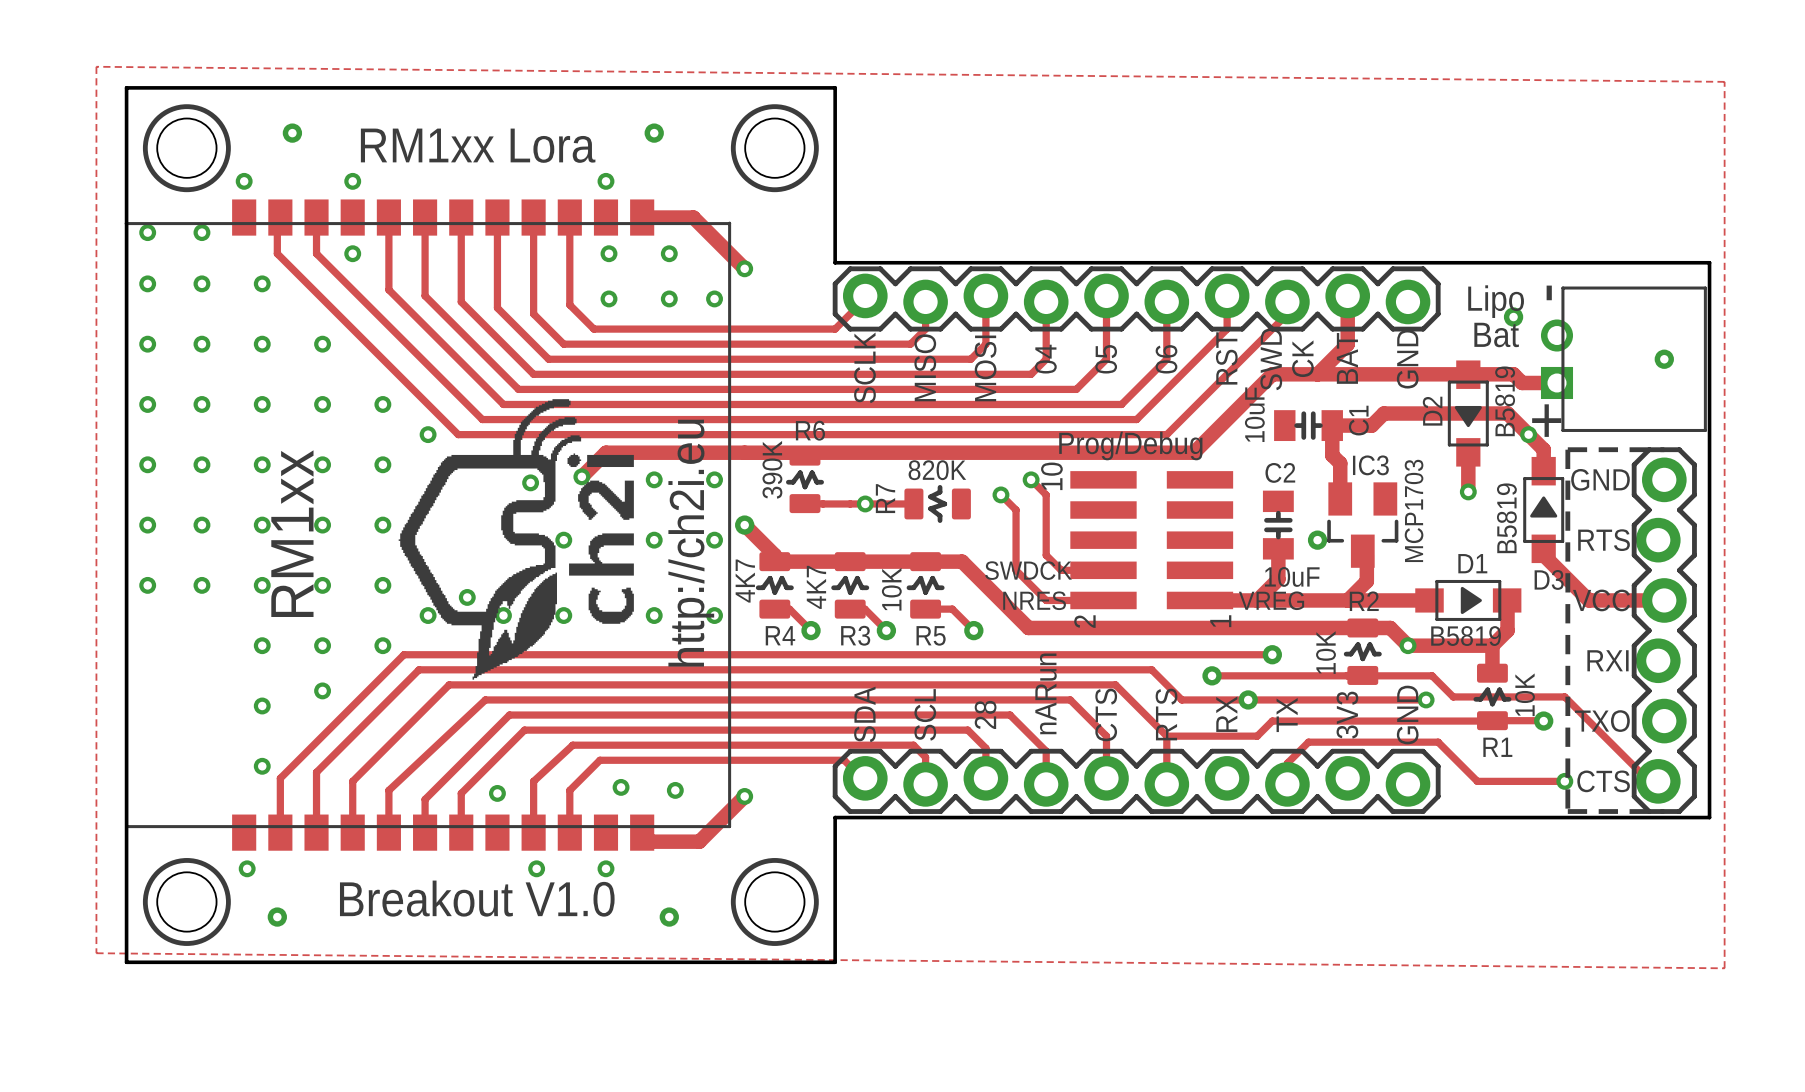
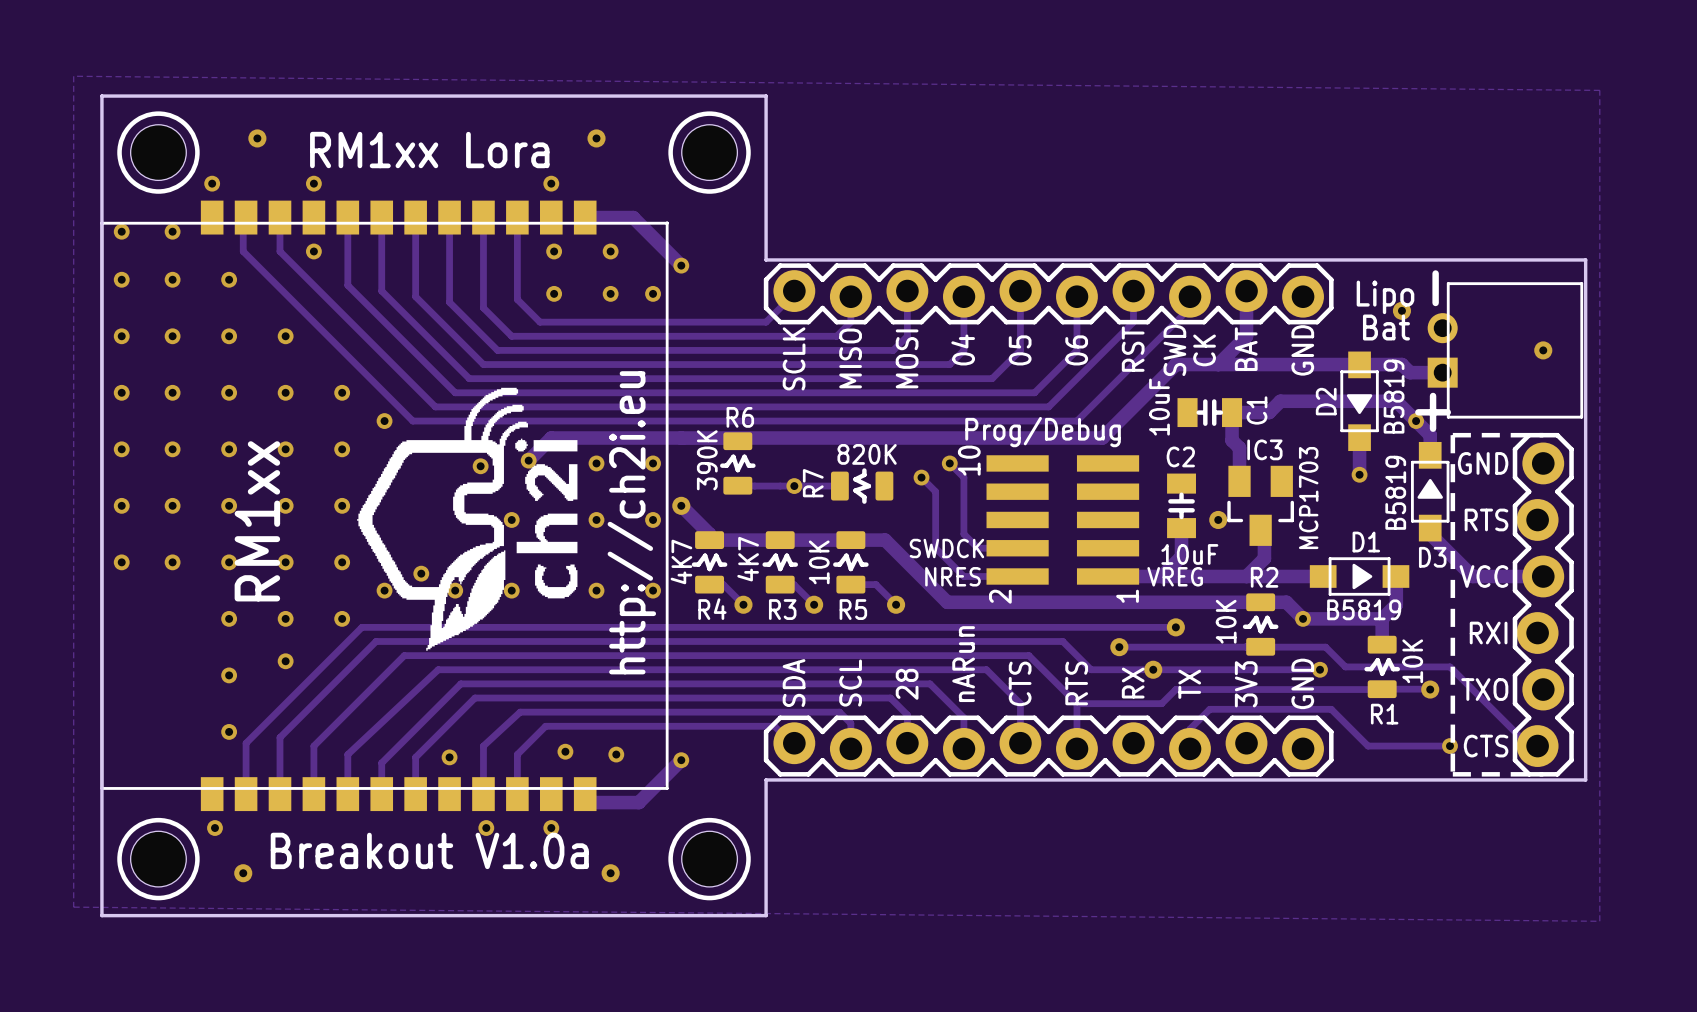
text: Breakout V1.0 (477, 898) -> Breakout V1.0a (429, 850)

